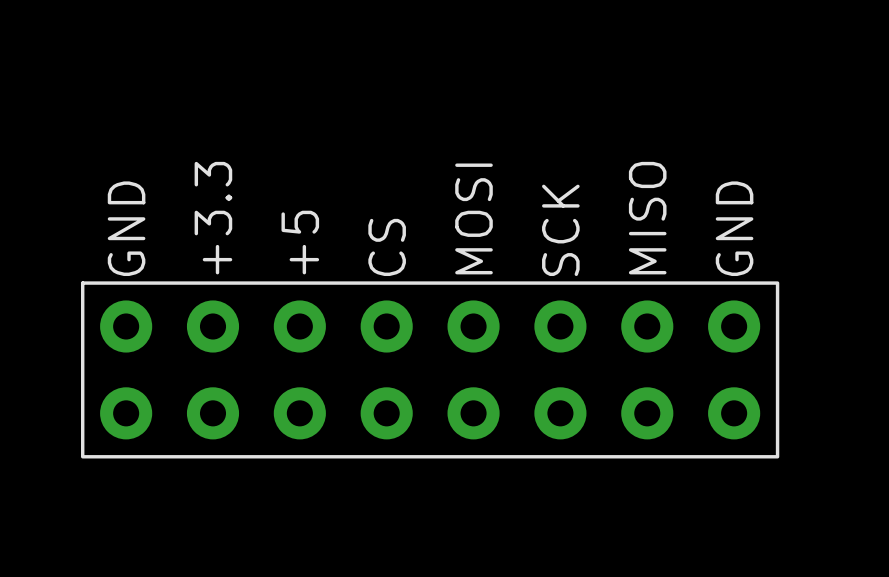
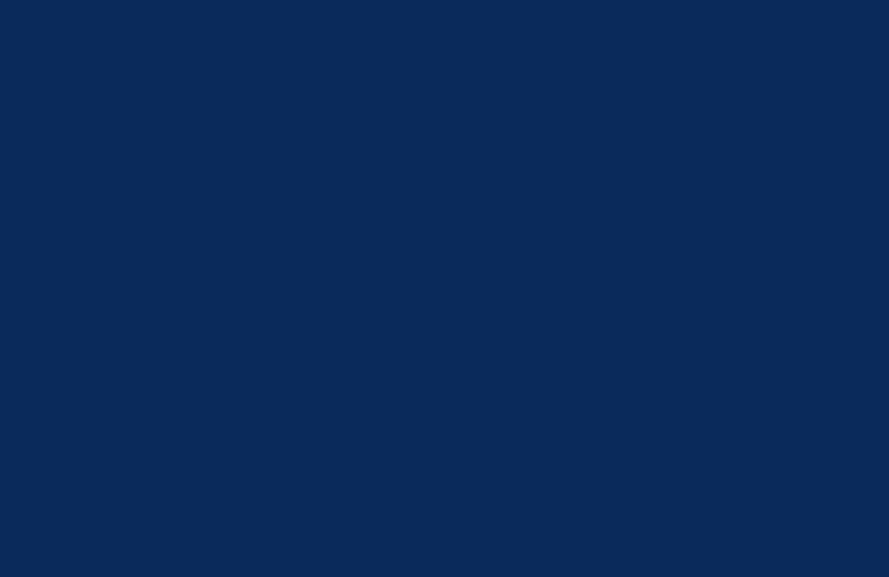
part: (430, 369) -> none

